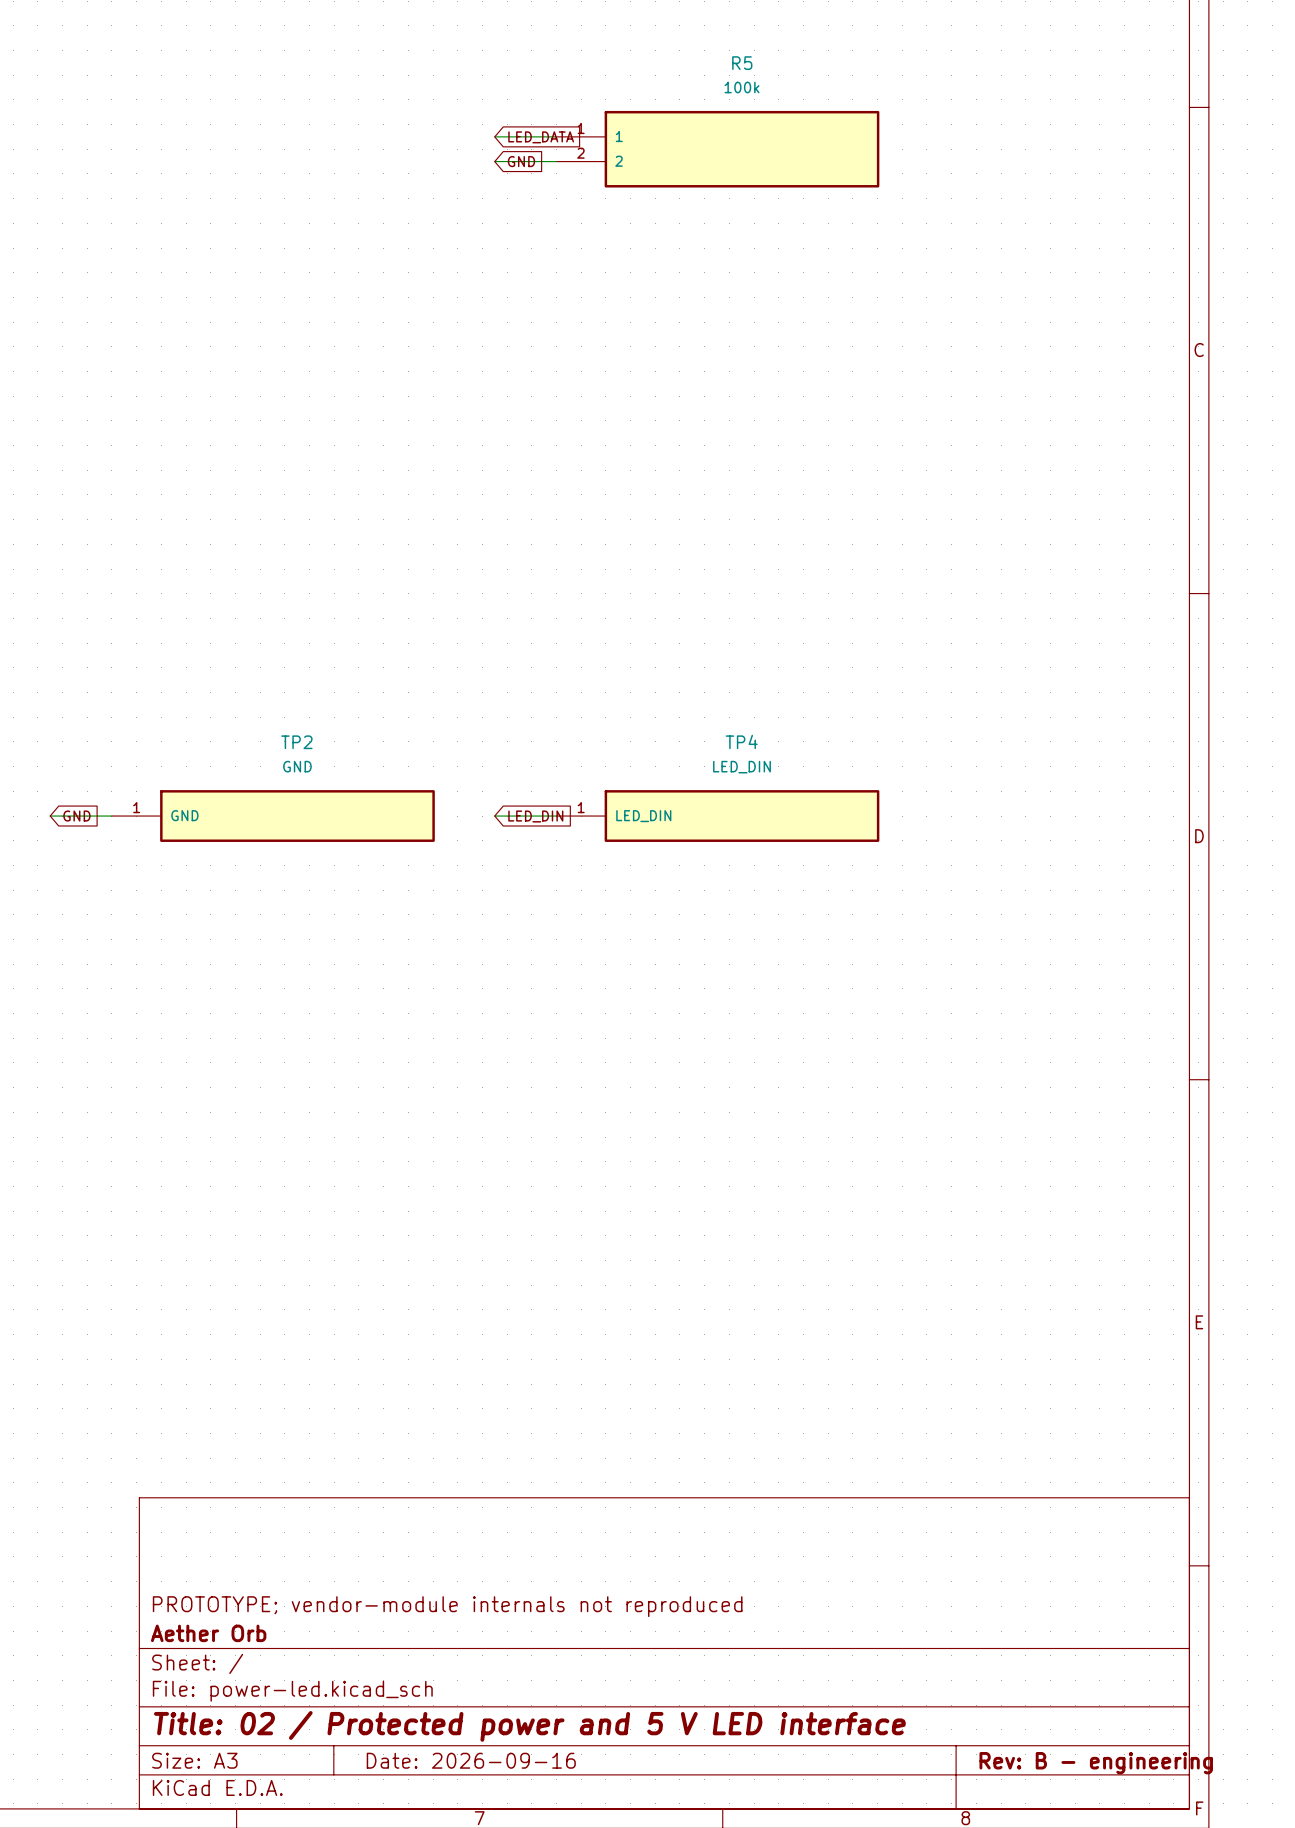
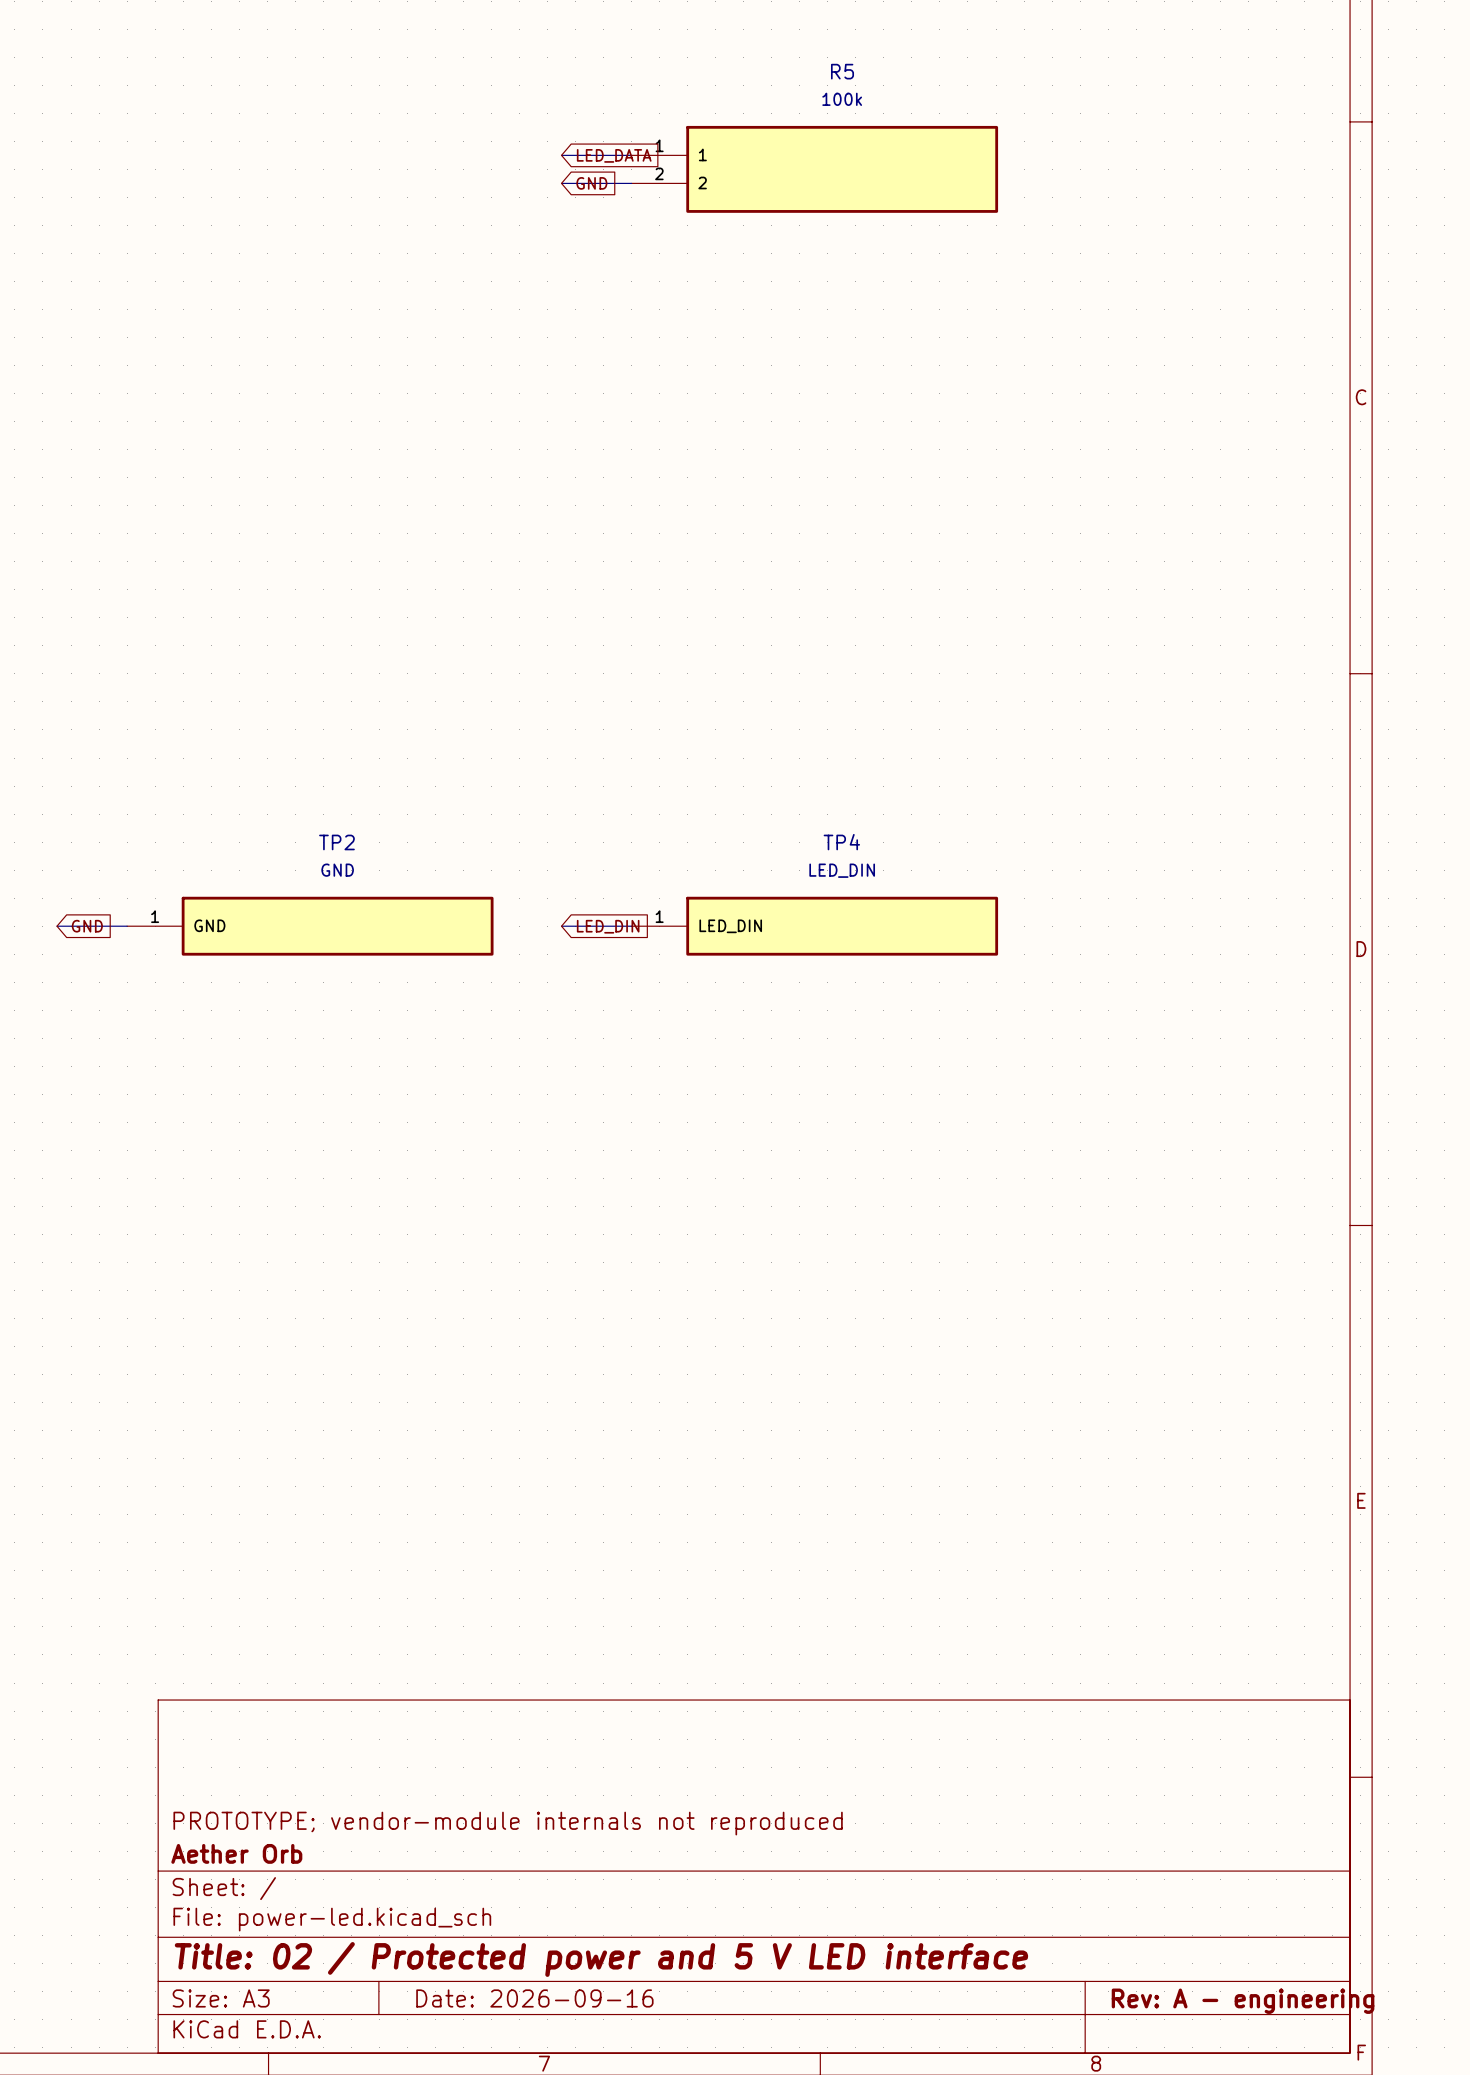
title block: Rev: B - engineering (1096, 1763) -> Rev: A - engineering (1243, 2001)

